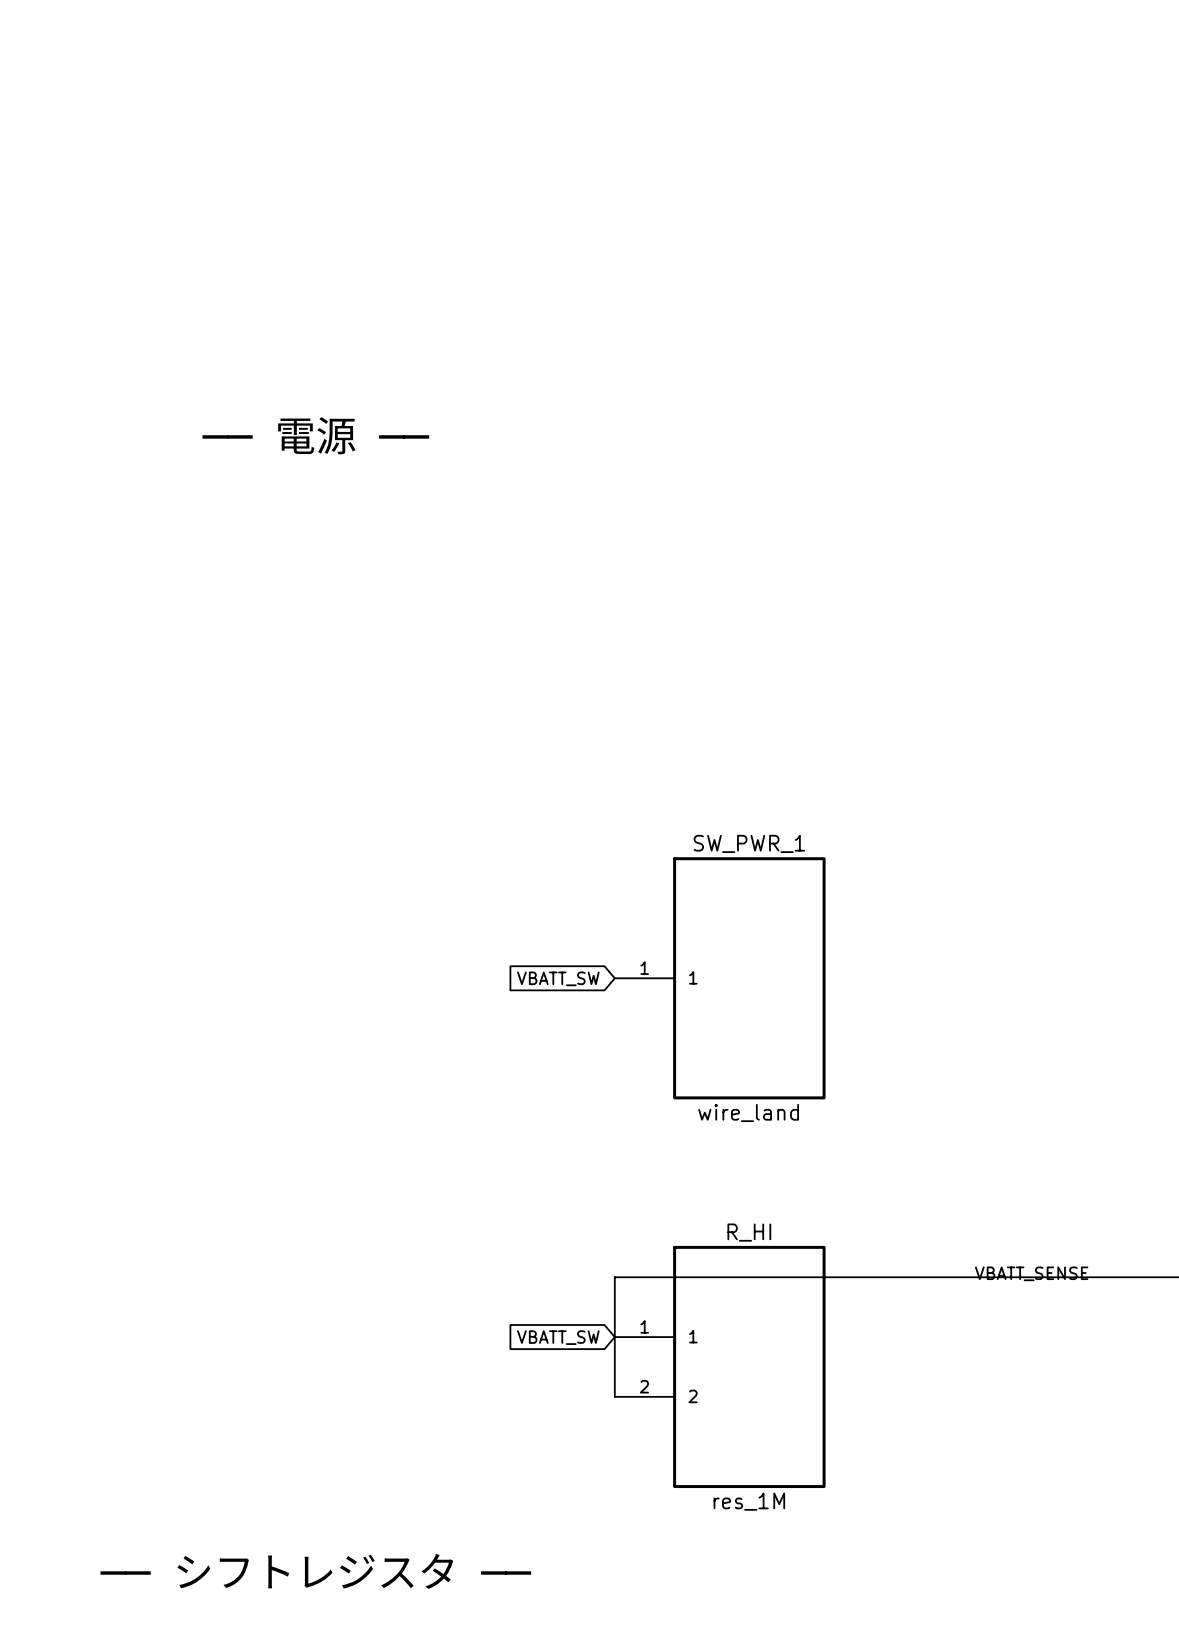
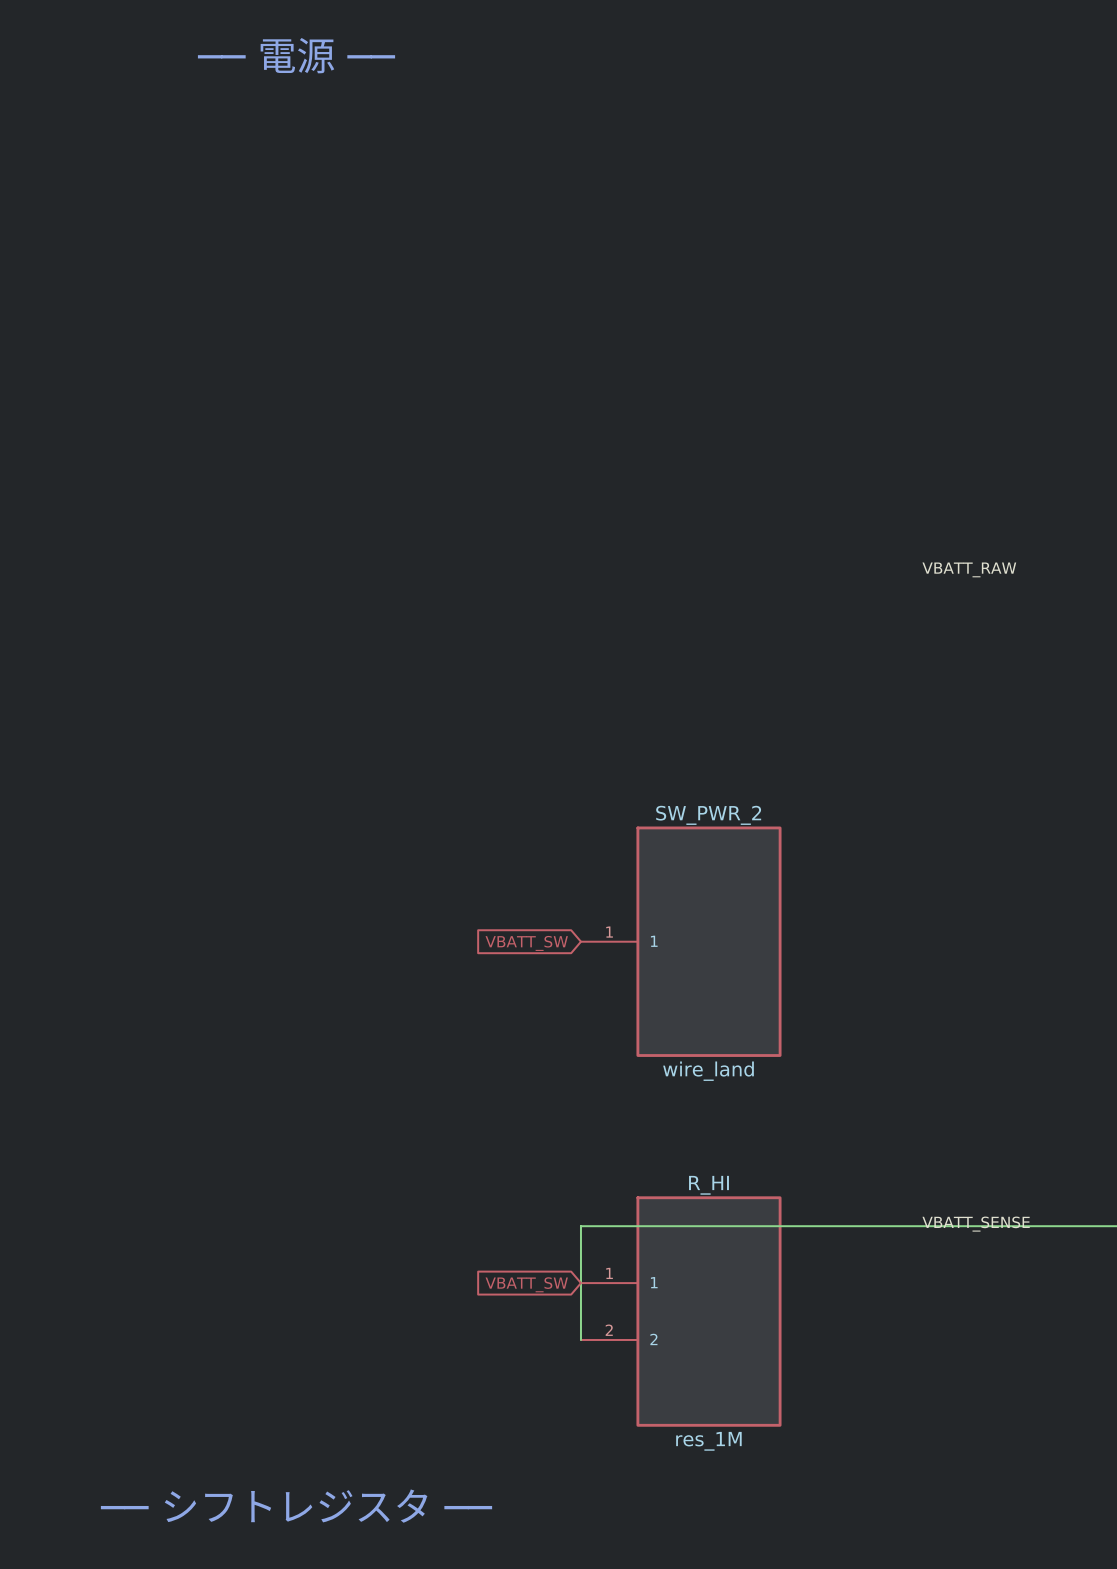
text: none -> ── 電源 ── (296, 55)
text: ── 電源 ── (315, 435) -> none
label: none -> VBATT_RAW (969, 569)
SW_PWR_1 name: SW_PWR_1 (749, 843) -> SW_PWR_2 (708, 815)

